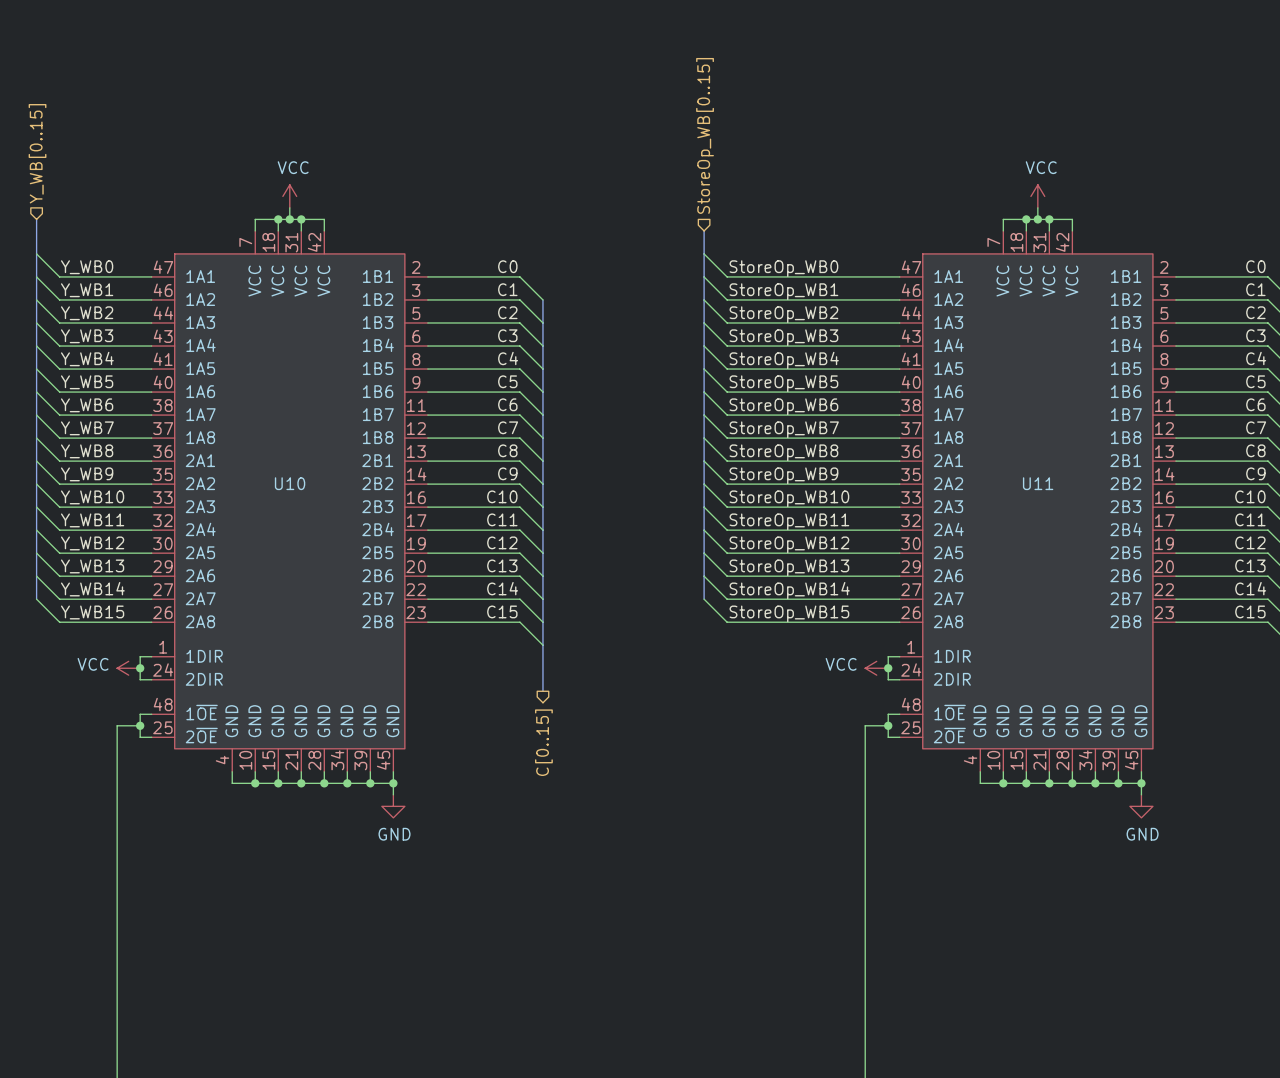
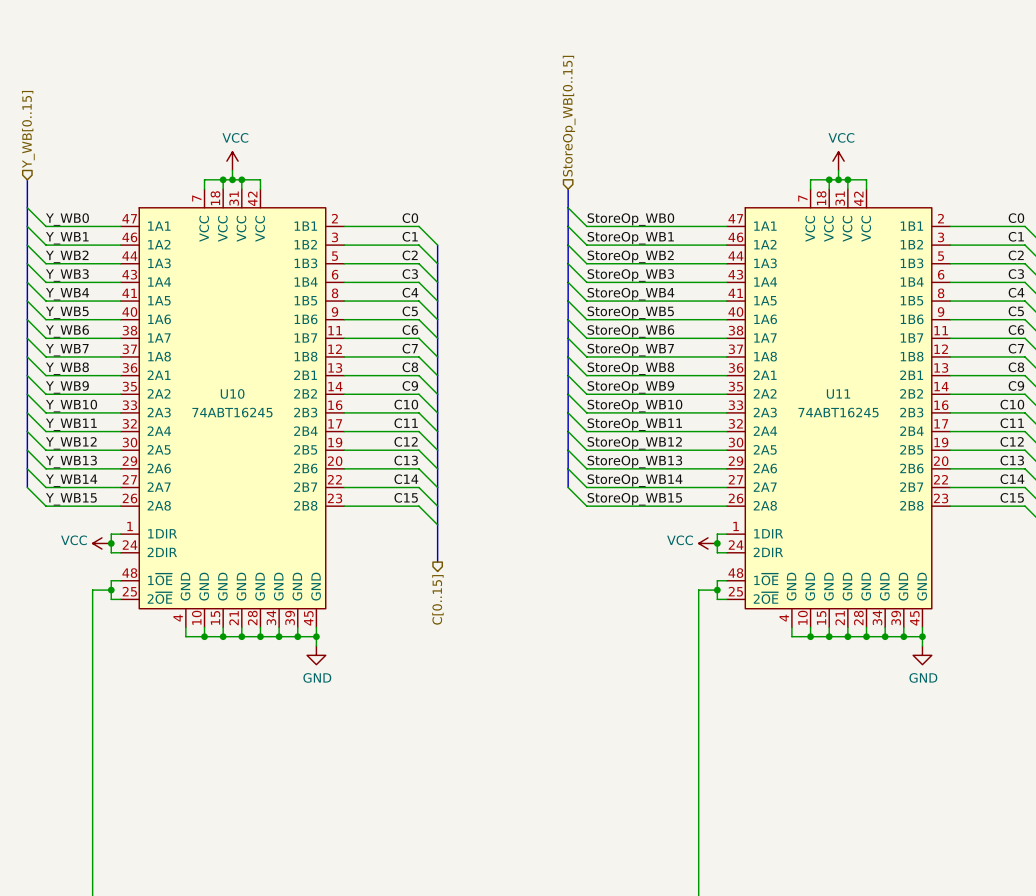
U10 value: none -> 74ABT16245 (232, 412)
U11 value: none -> 74ABT16245 (838, 412)

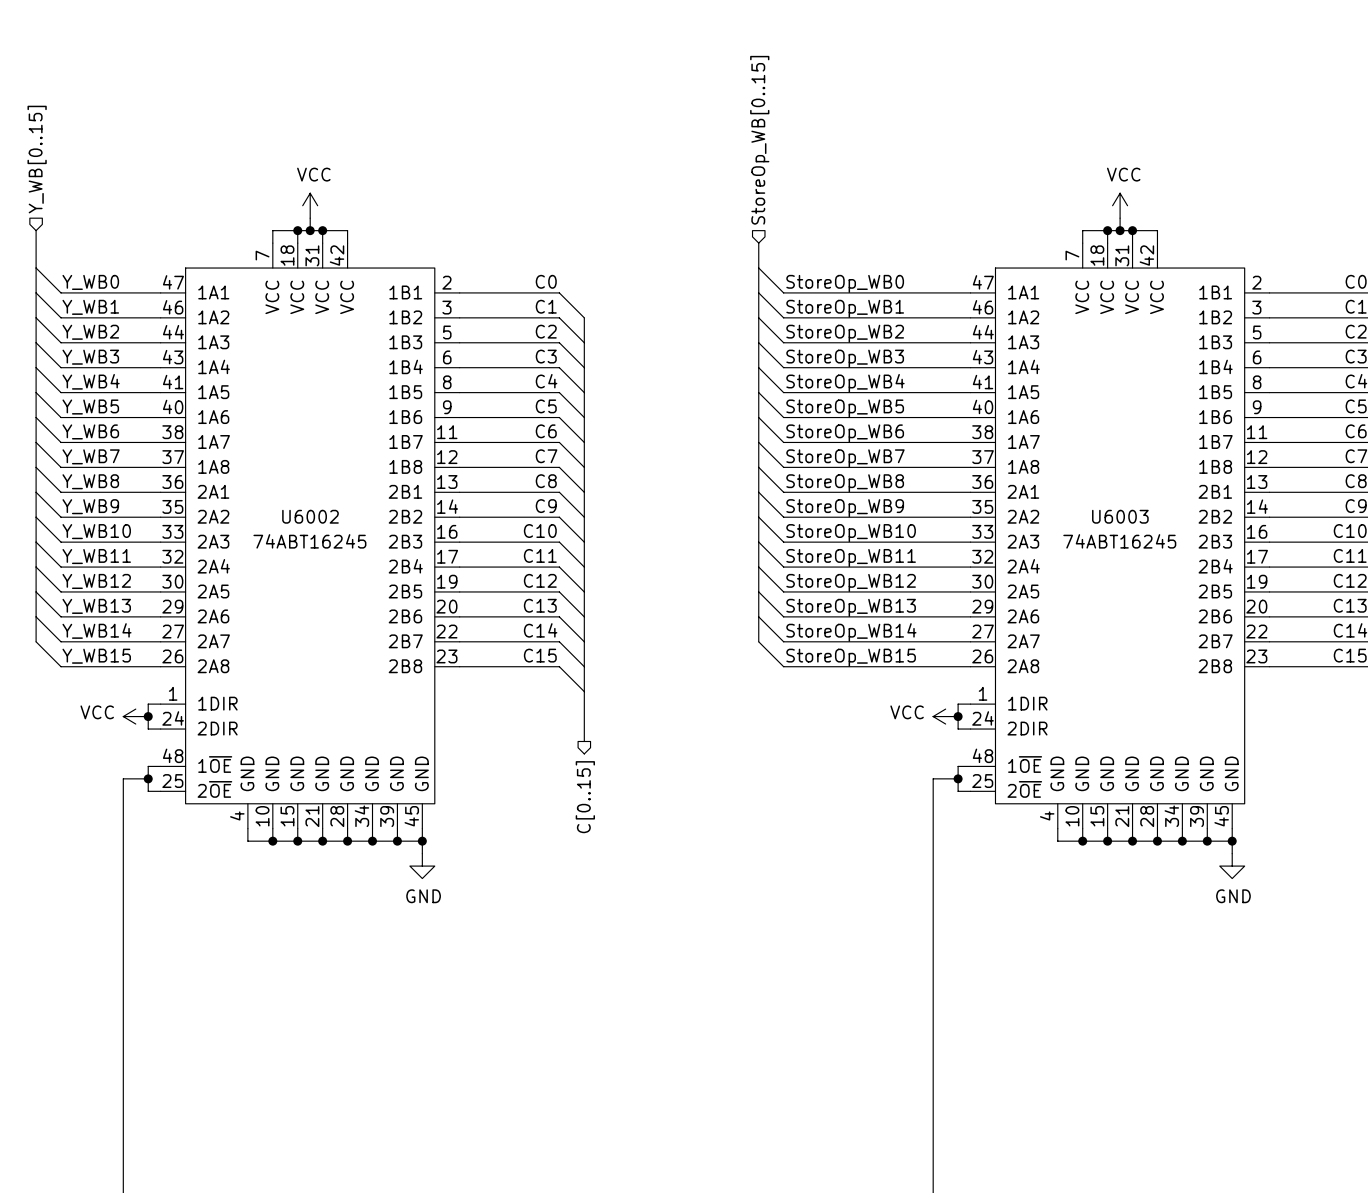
U10 name: U10 (232, 393) -> U6002 (310, 516)
U11 name: U11 (838, 394) -> U6003 (1120, 516)

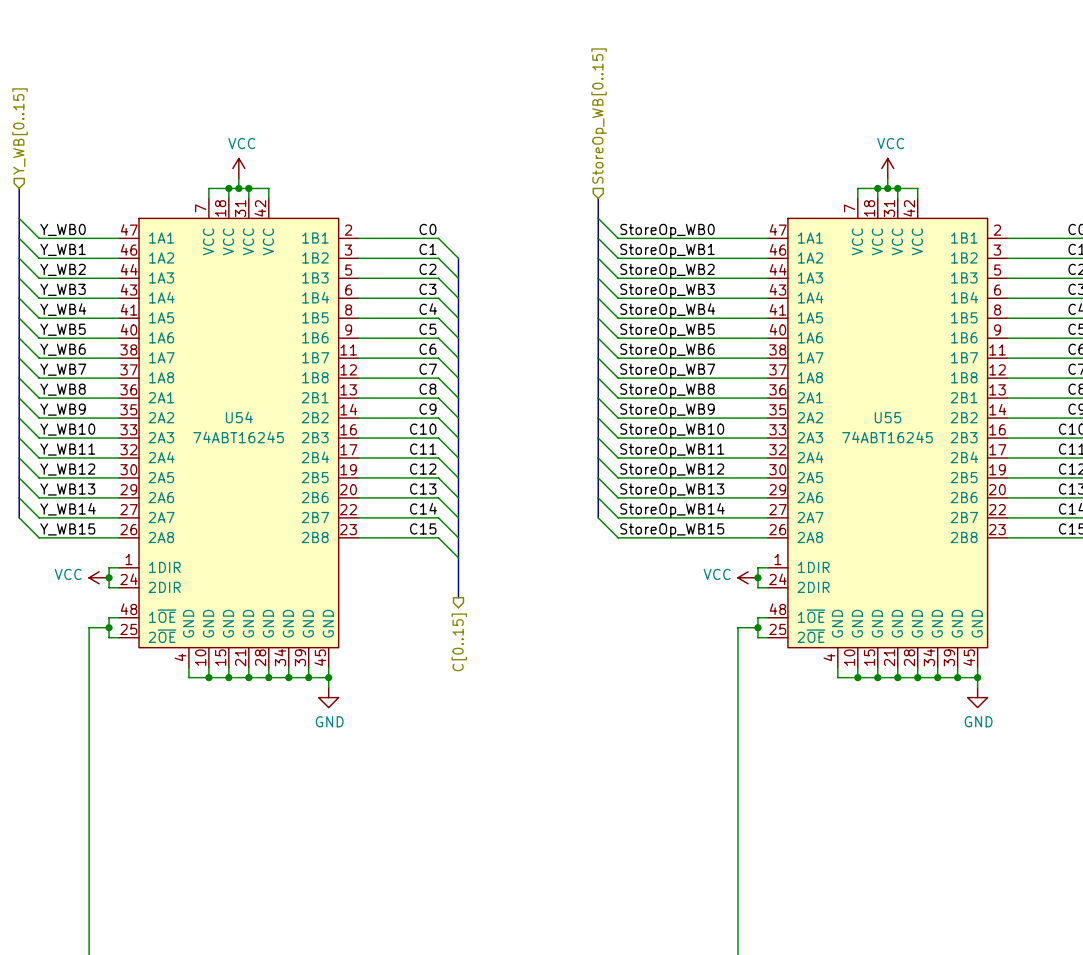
U6002 name: U6002 (310, 516) -> U54 (239, 417)
U6003 name: U6003 (1120, 516) -> U55 (888, 417)

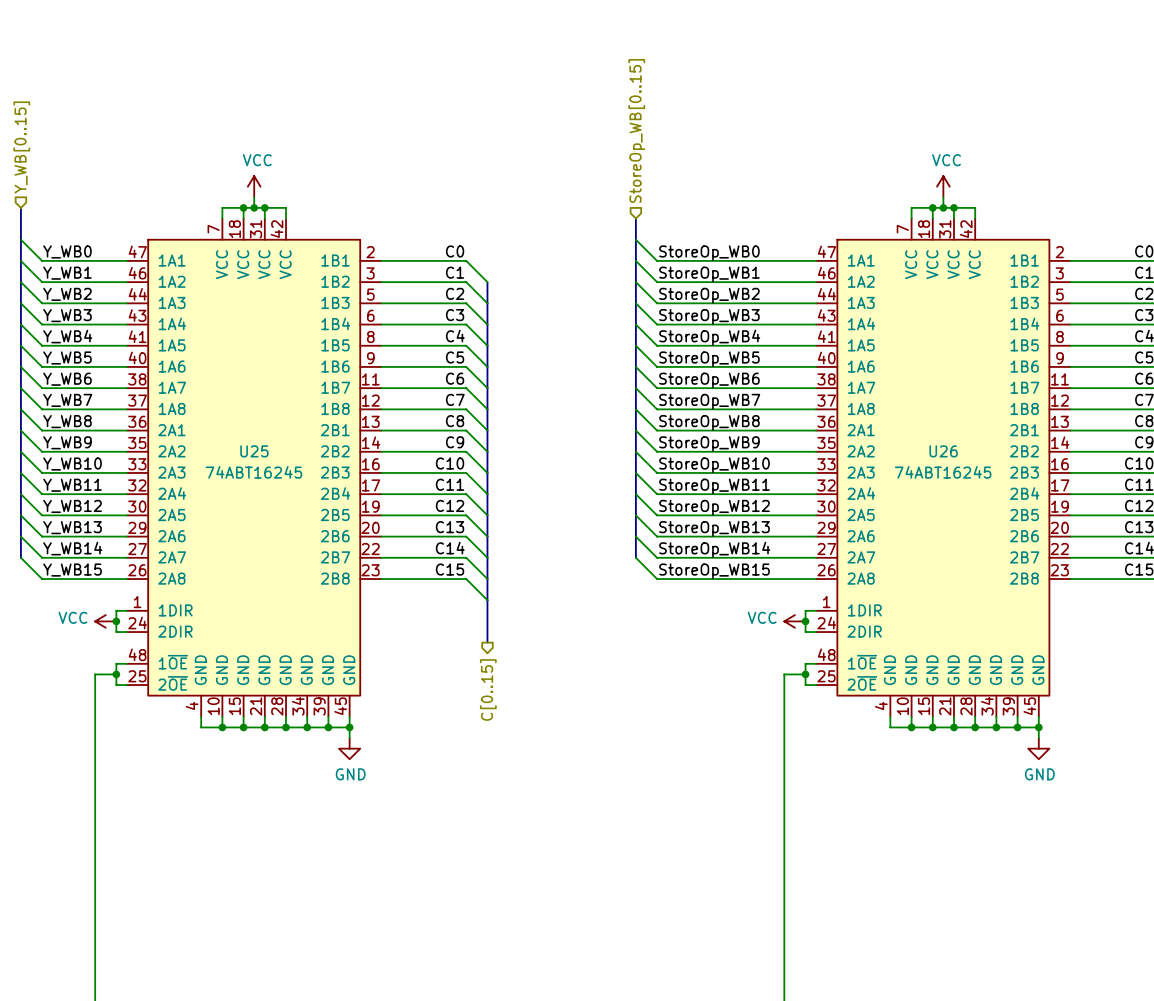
U54 name: U54 (239, 417) -> U25 (254, 451)
U55 name: U55 (888, 417) -> U26 (943, 451)

